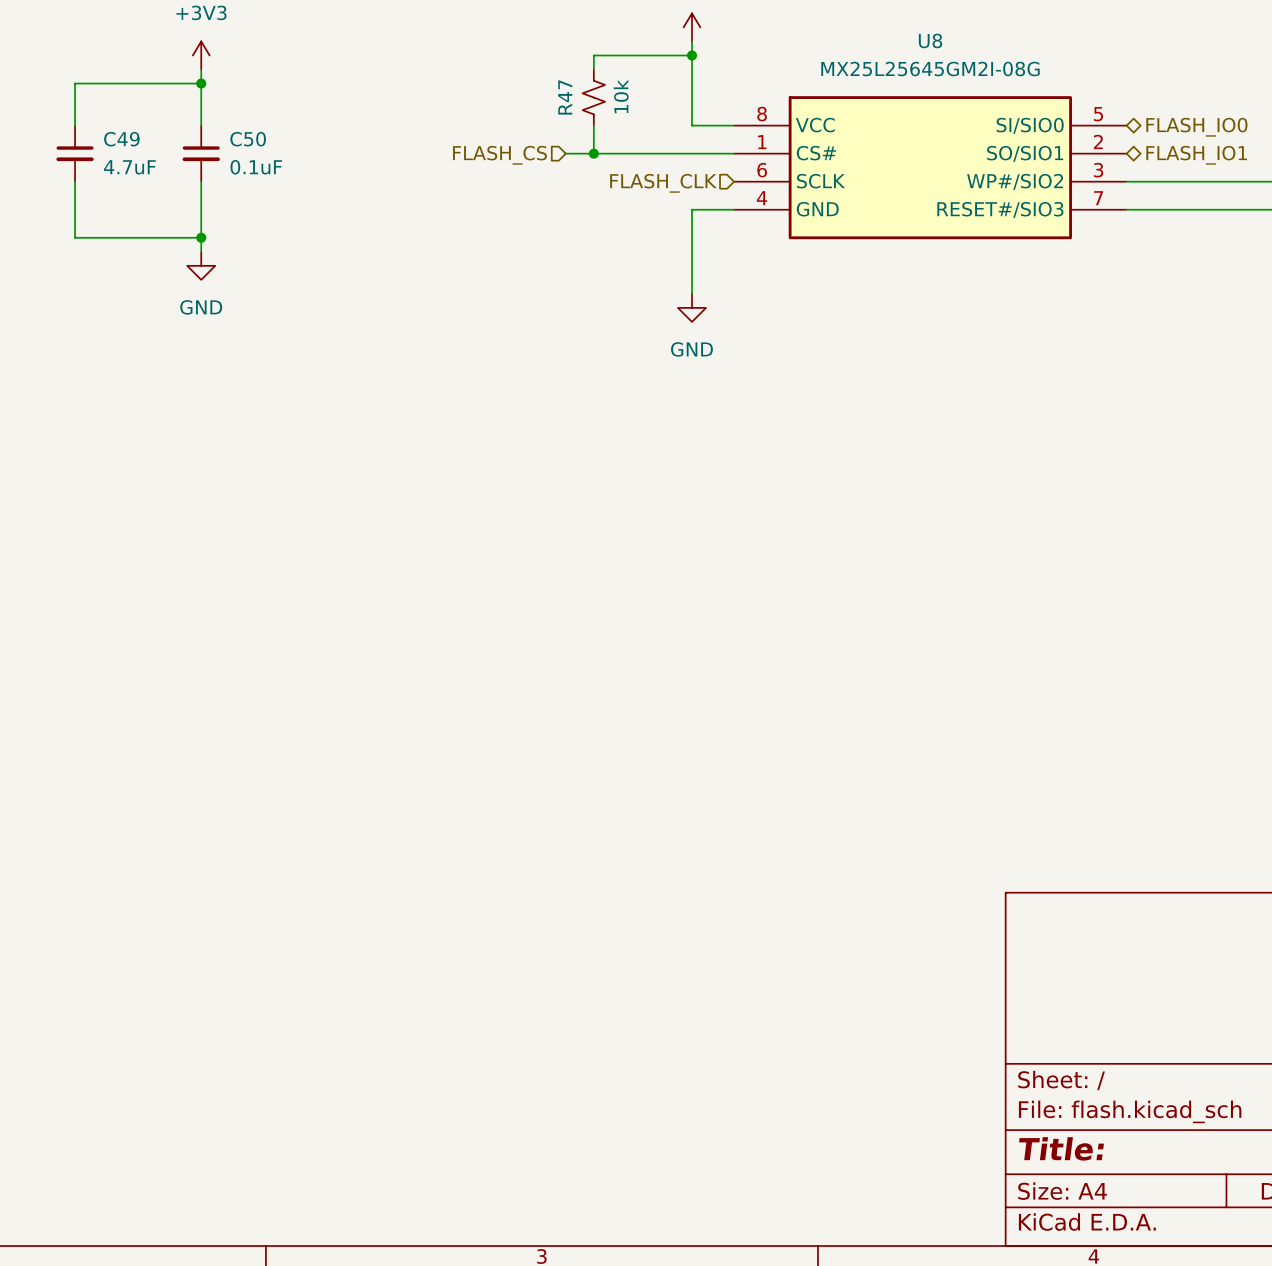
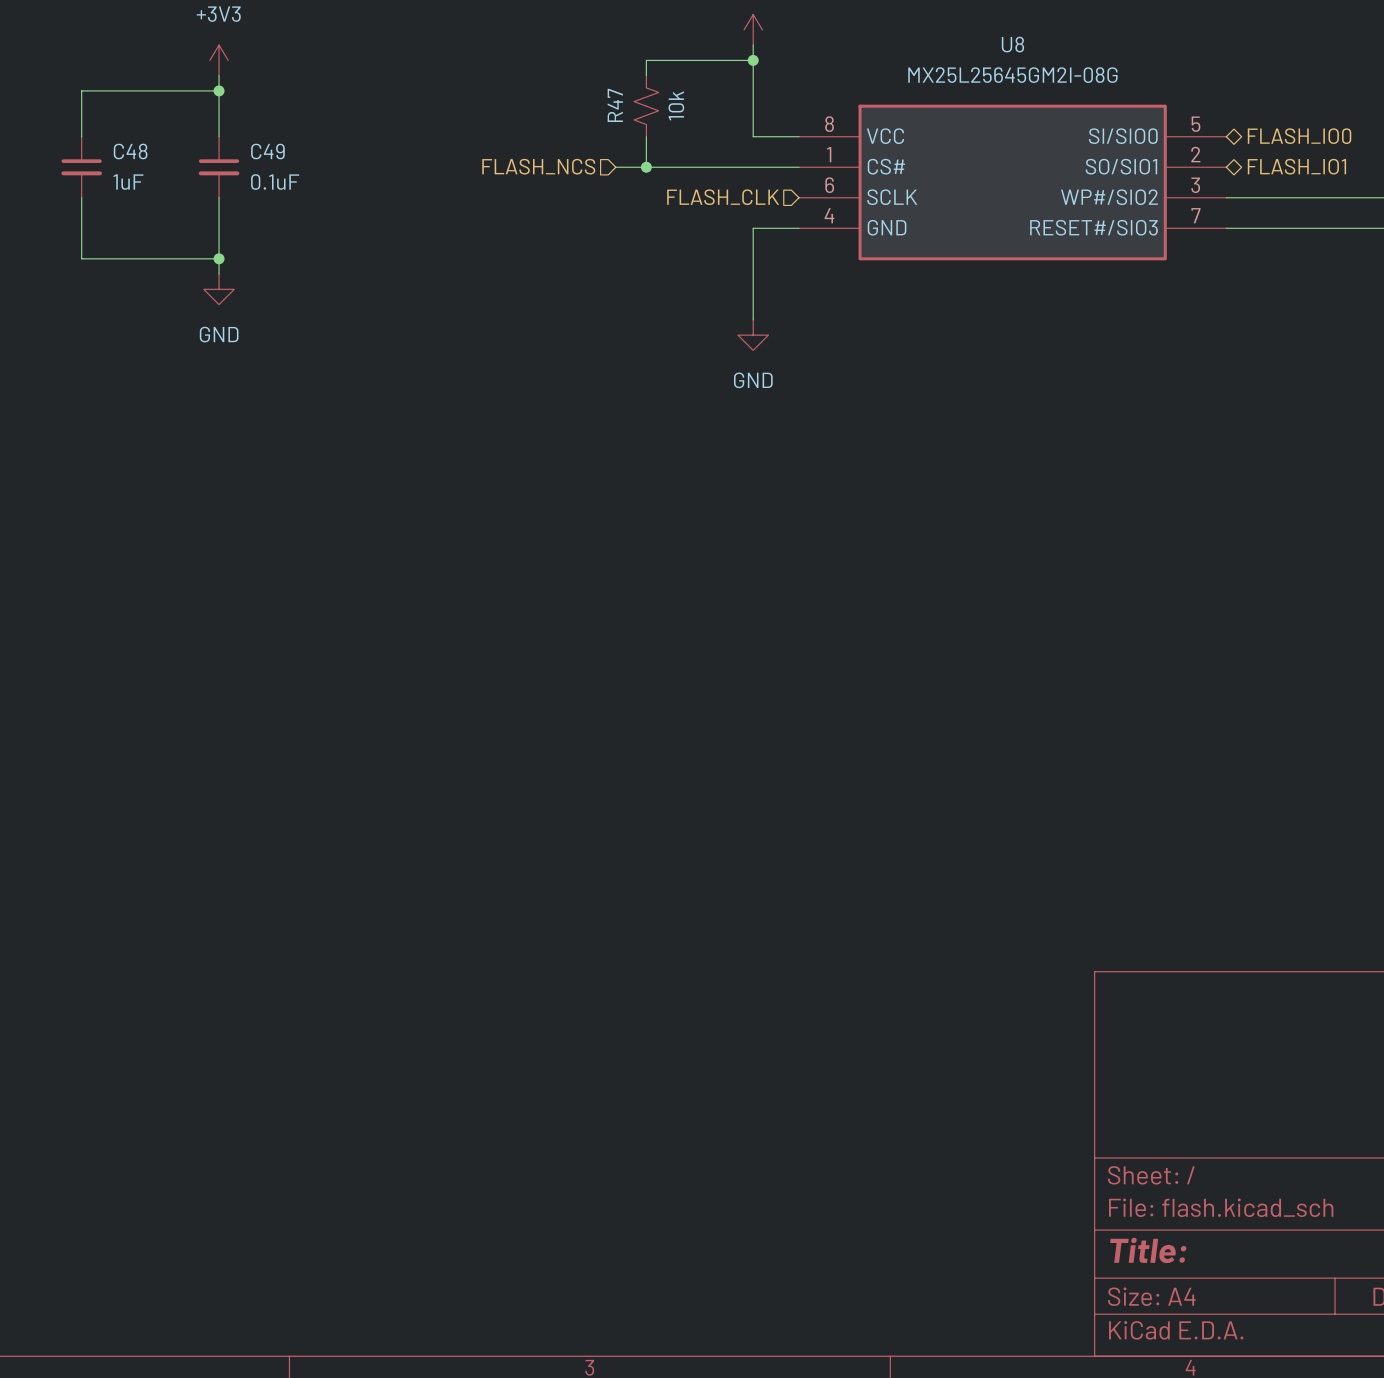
C49 name: C49 (121, 139) -> C48 (130, 151)
C50 name: C50 (248, 139) -> C49 (267, 151)
hierarchical label: FLASH_CS (499, 155) -> FLASH_NCS (538, 166)
C49 value: 4.7uF (129, 167) -> 1uF (128, 182)

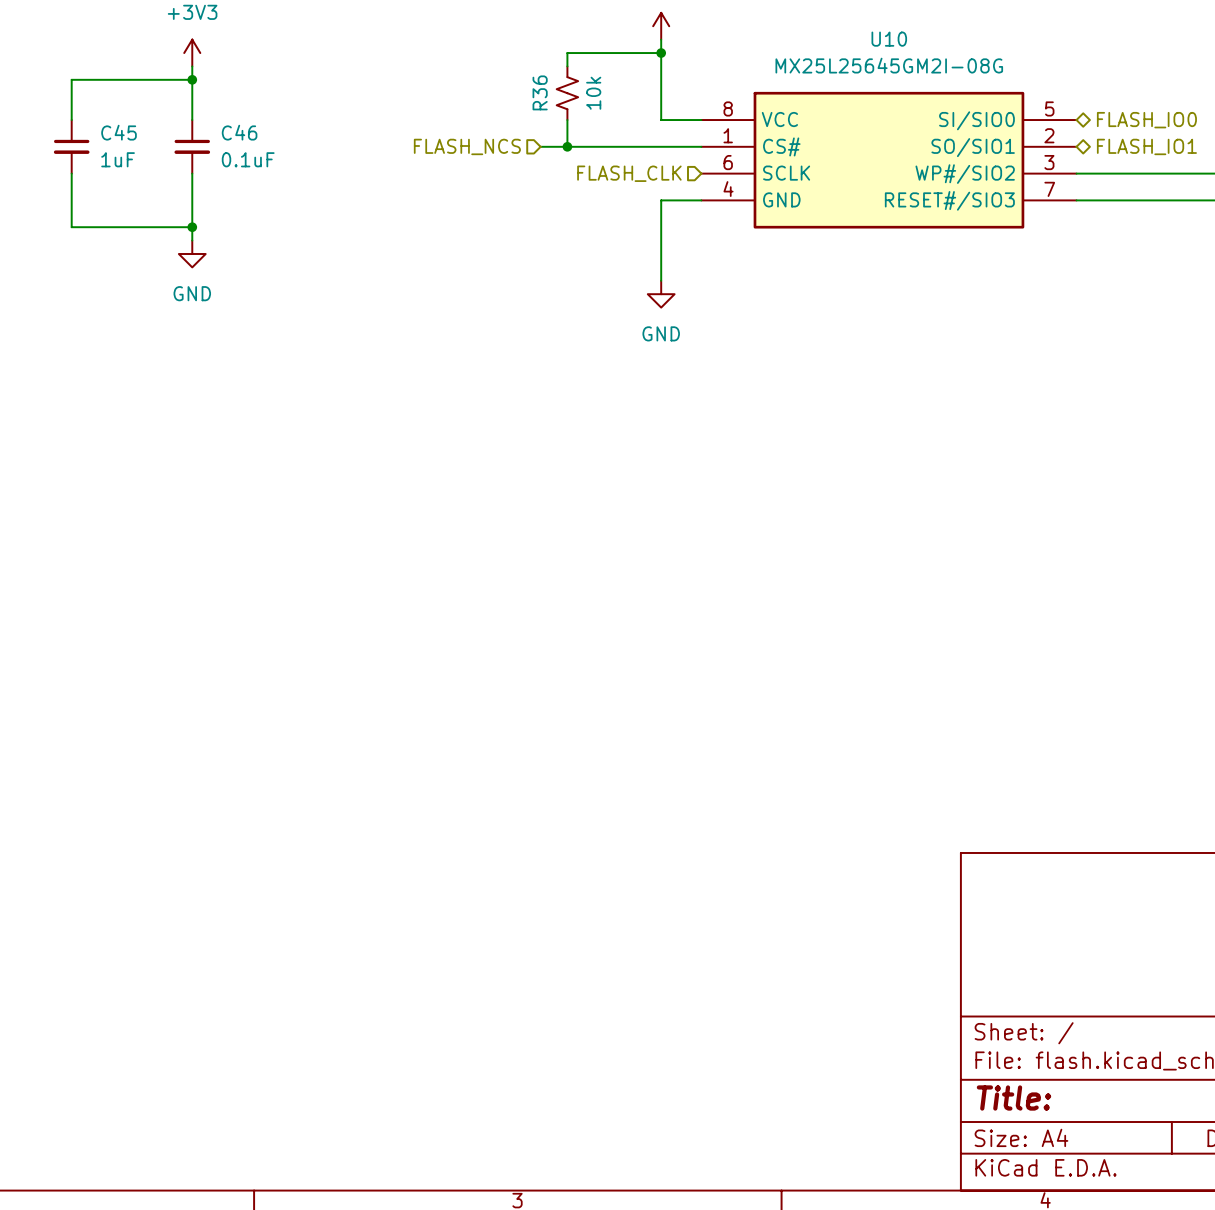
U8 name: U8 (1012, 44) -> U10 (889, 39)
R47 name: R47 (615, 105) -> R36 (540, 92)
C48 name: C48 (130, 151) -> C45 (119, 132)
C49 name: C49 (267, 151) -> C46 (239, 132)

